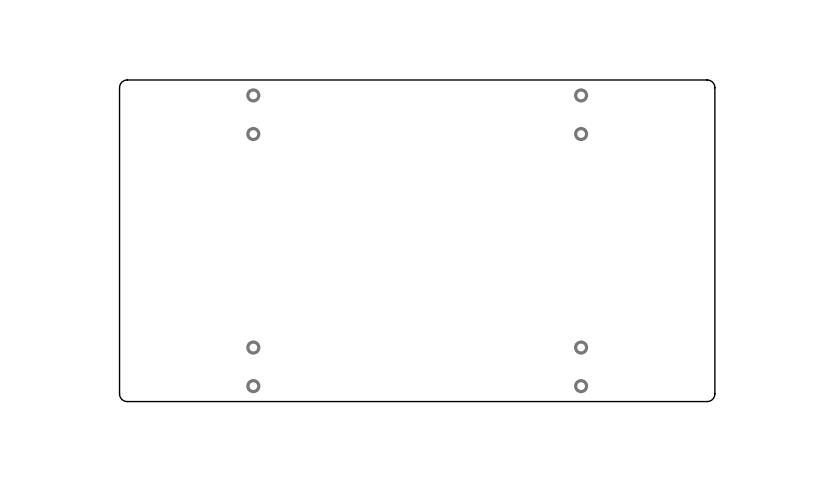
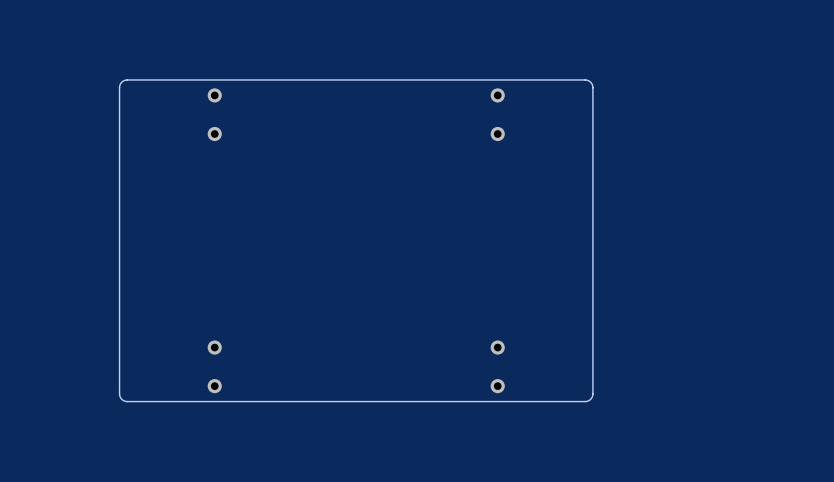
board edge: (585, 79) (708, 80) (713, 82) (714, 87) (714, 396) (707, 401) (585, 401) -> (585, 79) (590, 82) (592, 87) (592, 393) (590, 399) (585, 401)
via: none -> (214, 95)
via: (253, 95) -> none
via: none -> (497, 95)
via: (581, 95) -> none
via: none -> (214, 134)
via: (253, 134) -> none
via: none -> (497, 134)
via: (581, 134) -> none
via: none -> (214, 347)
via: (253, 347) -> none
via: none -> (497, 347)
via: (581, 347) -> none
via: none -> (214, 386)
via: (253, 386) -> none
via: none -> (497, 386)
via: (581, 386) -> none

